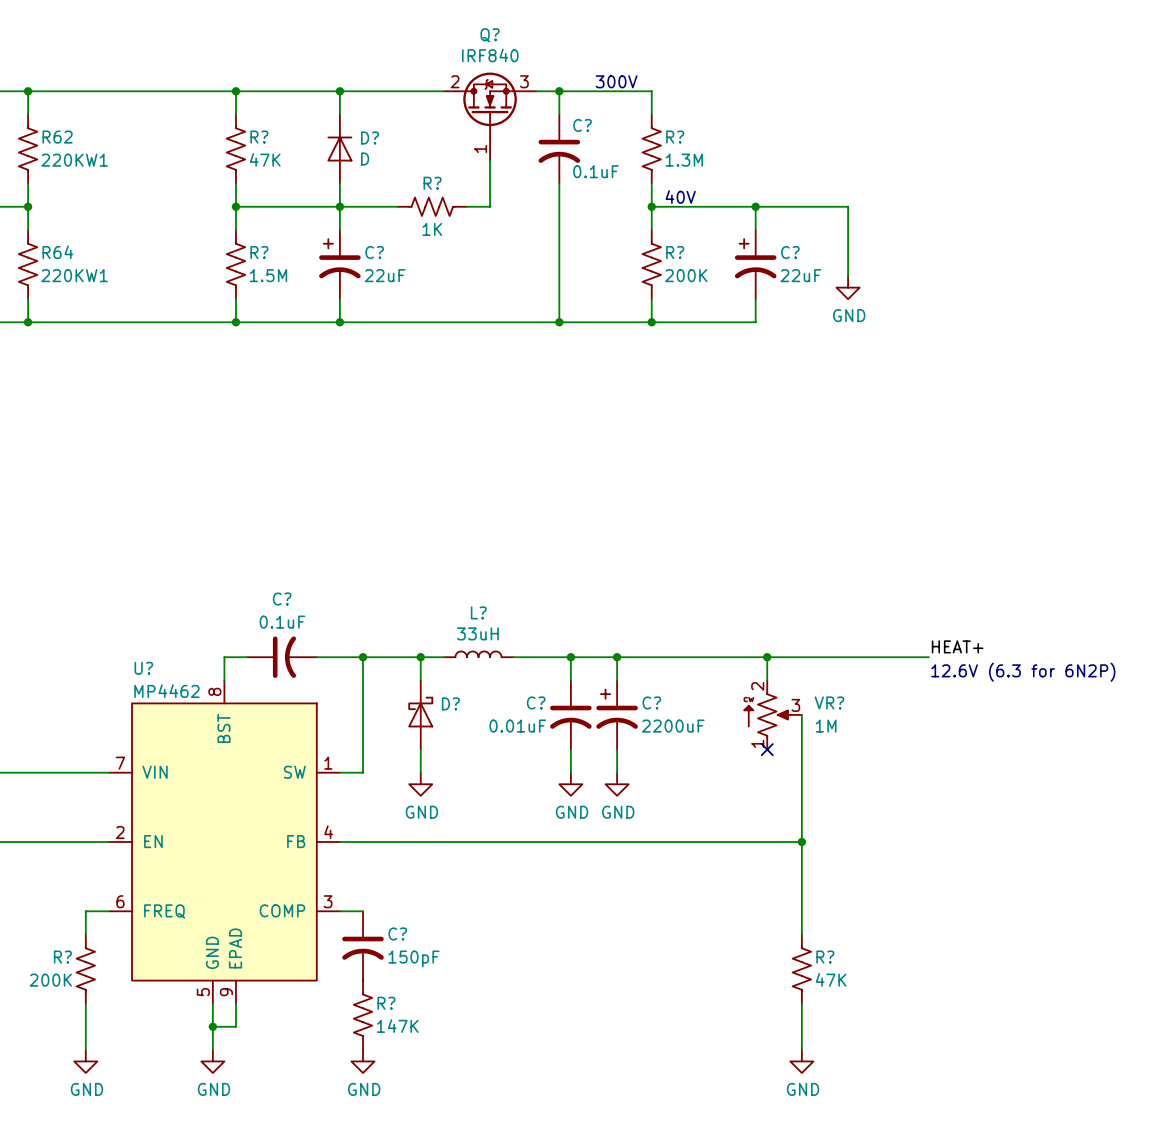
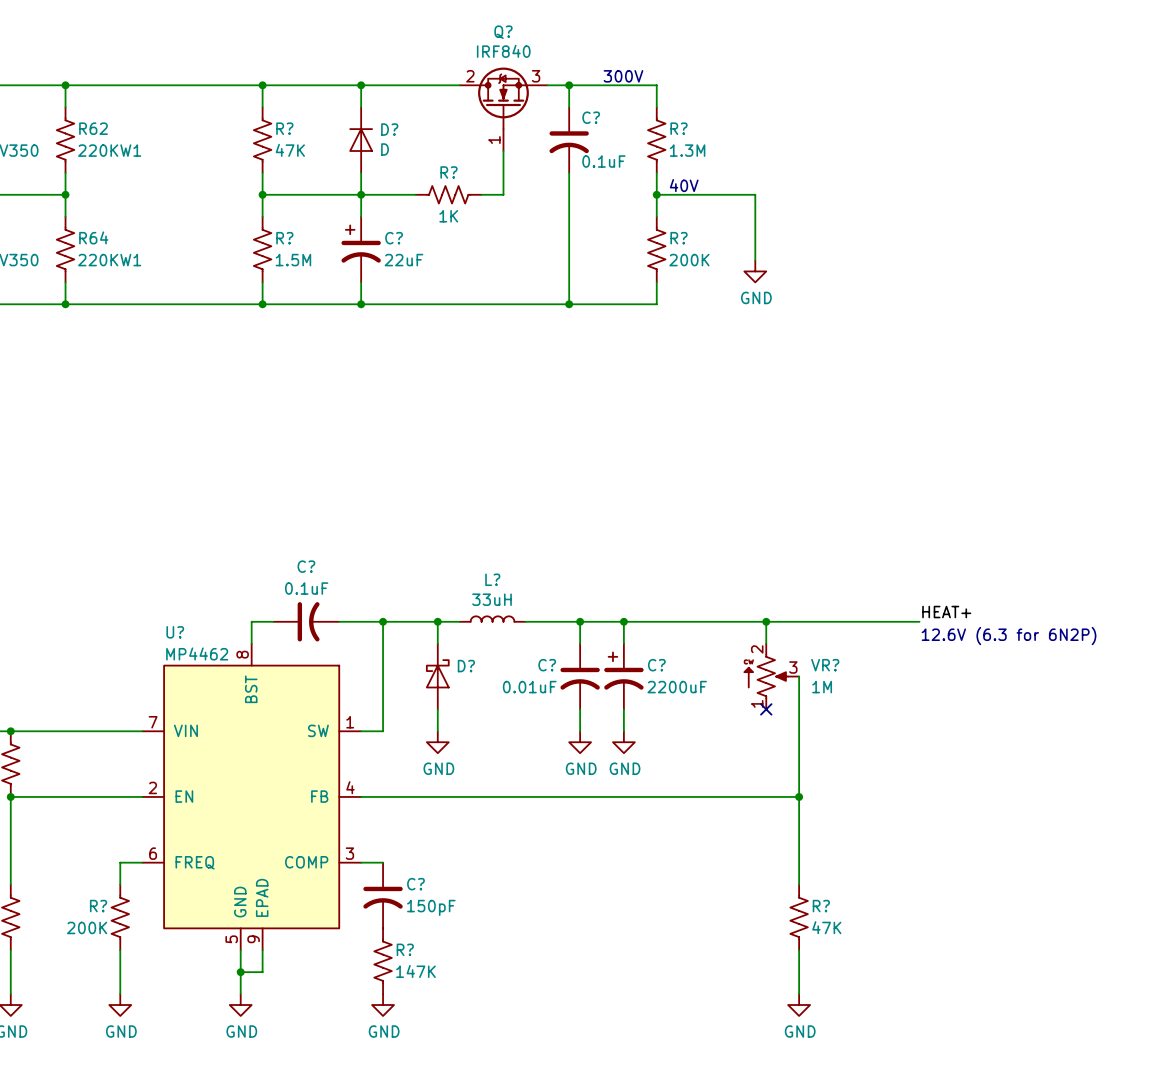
wire: (755, 206) (848, 206) (848, 276) -> none
junction: (755, 206) -> none
C?: 22uF (755, 264) -> none
power symbol position: GND (848, 287) -> GND (755, 271)
wire: (755, 299) (755, 322) (651, 322) -> none
junction: (651, 322) -> none

